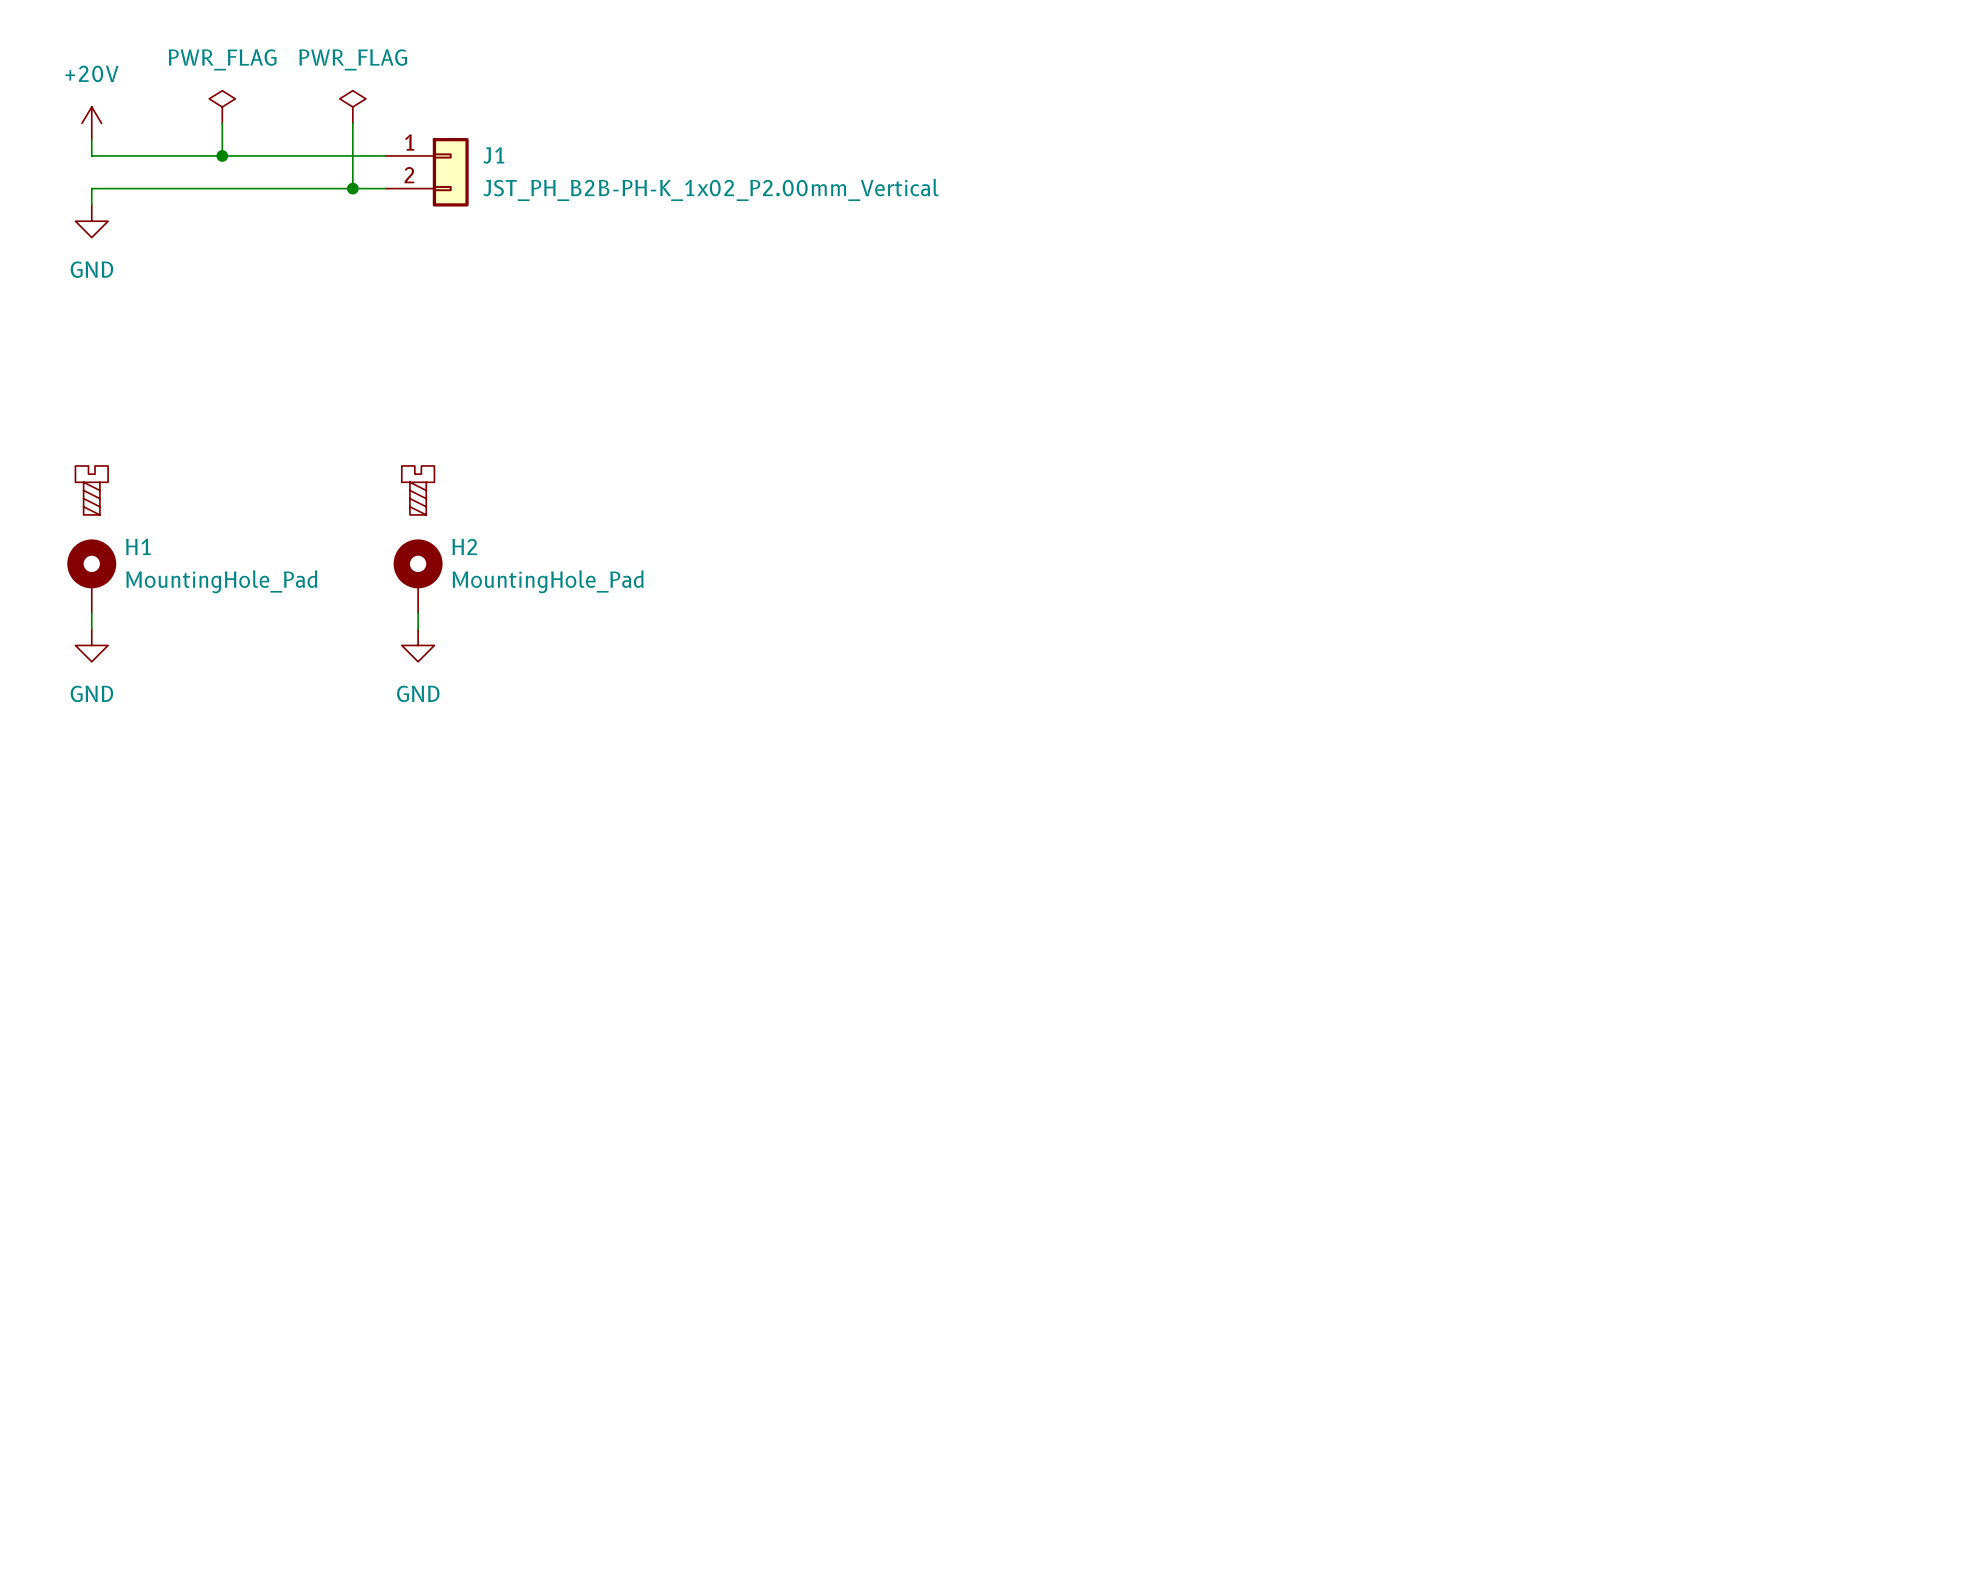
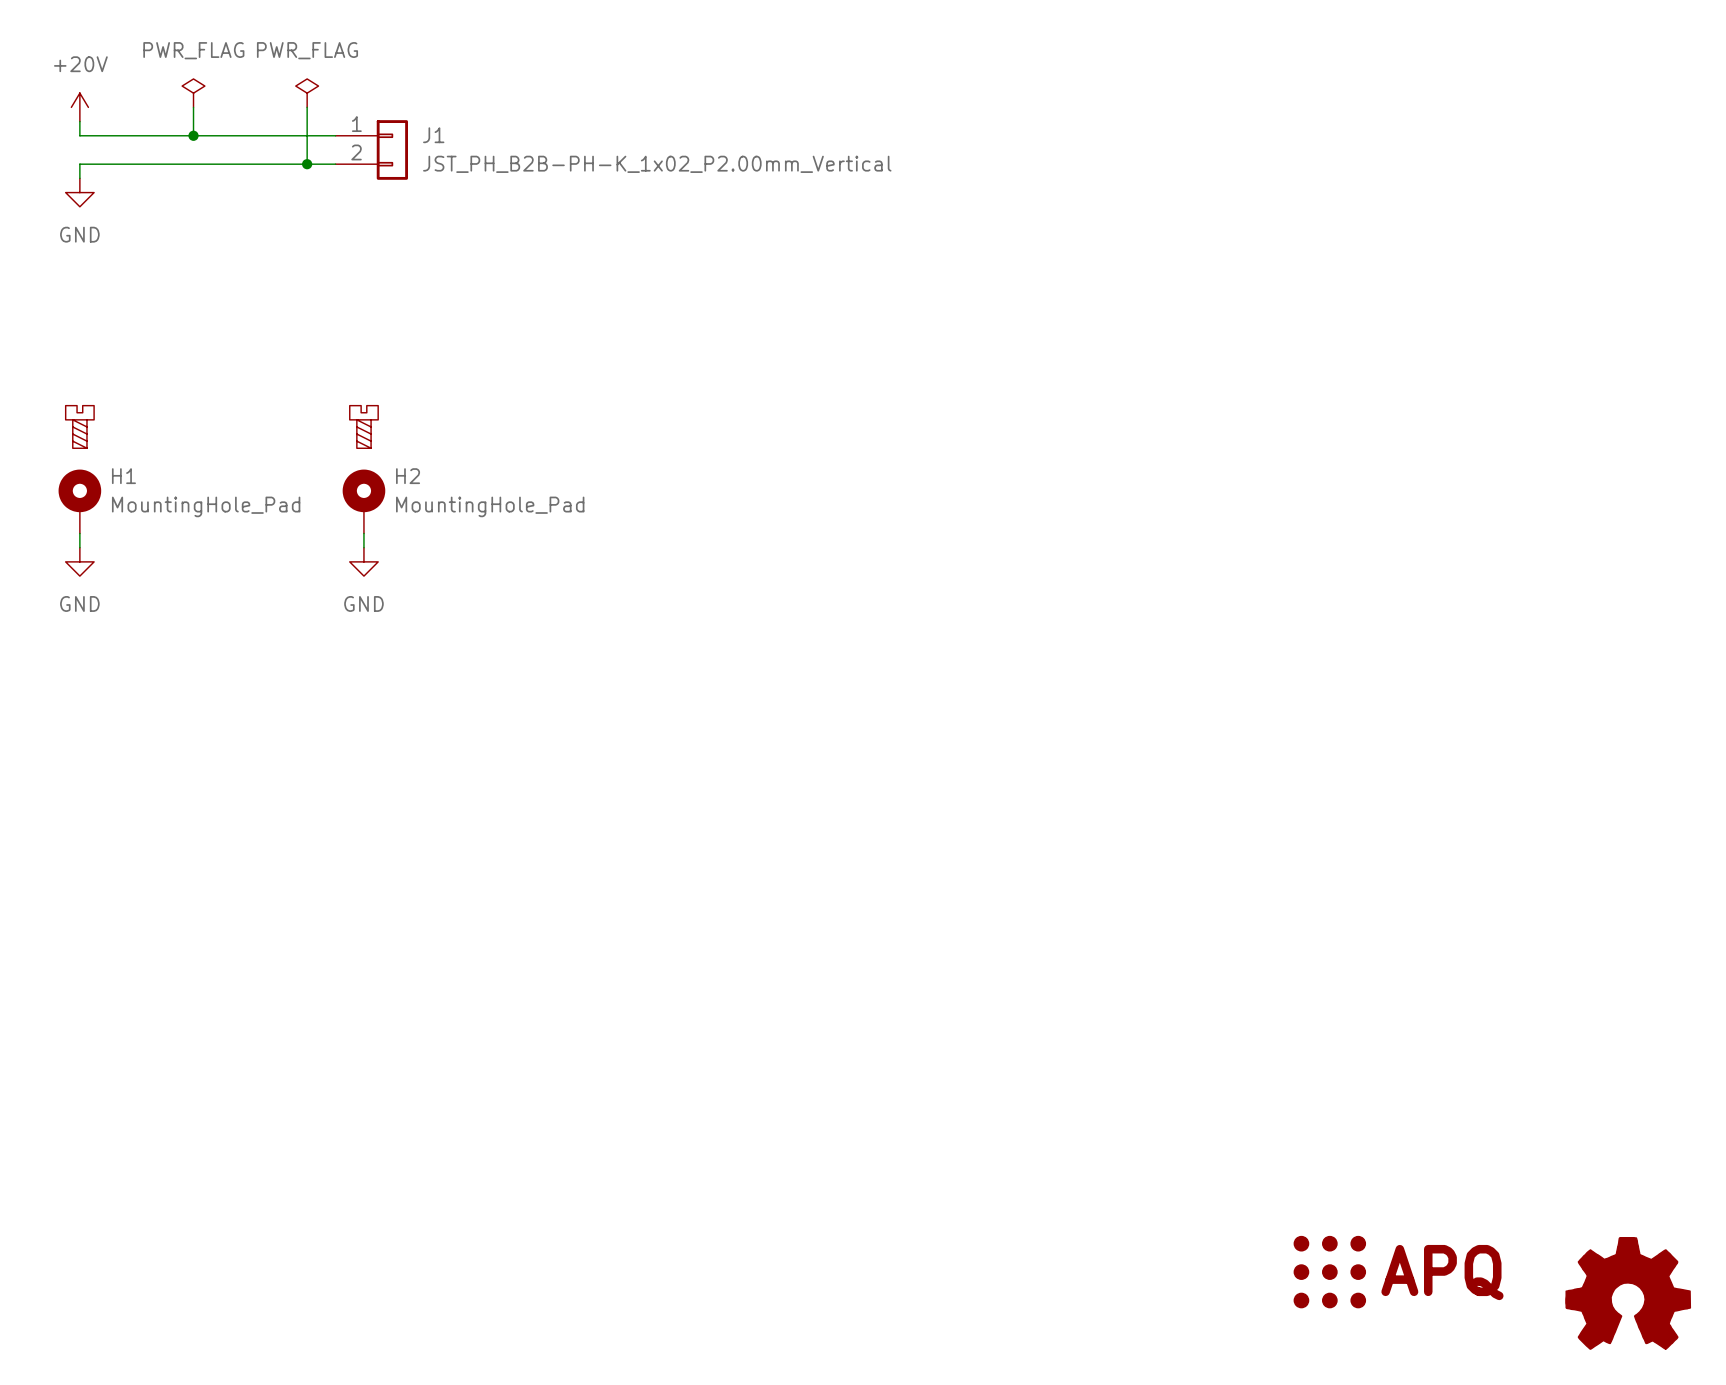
part: none -> (1329, 1272)
part: none -> (1628, 1293)

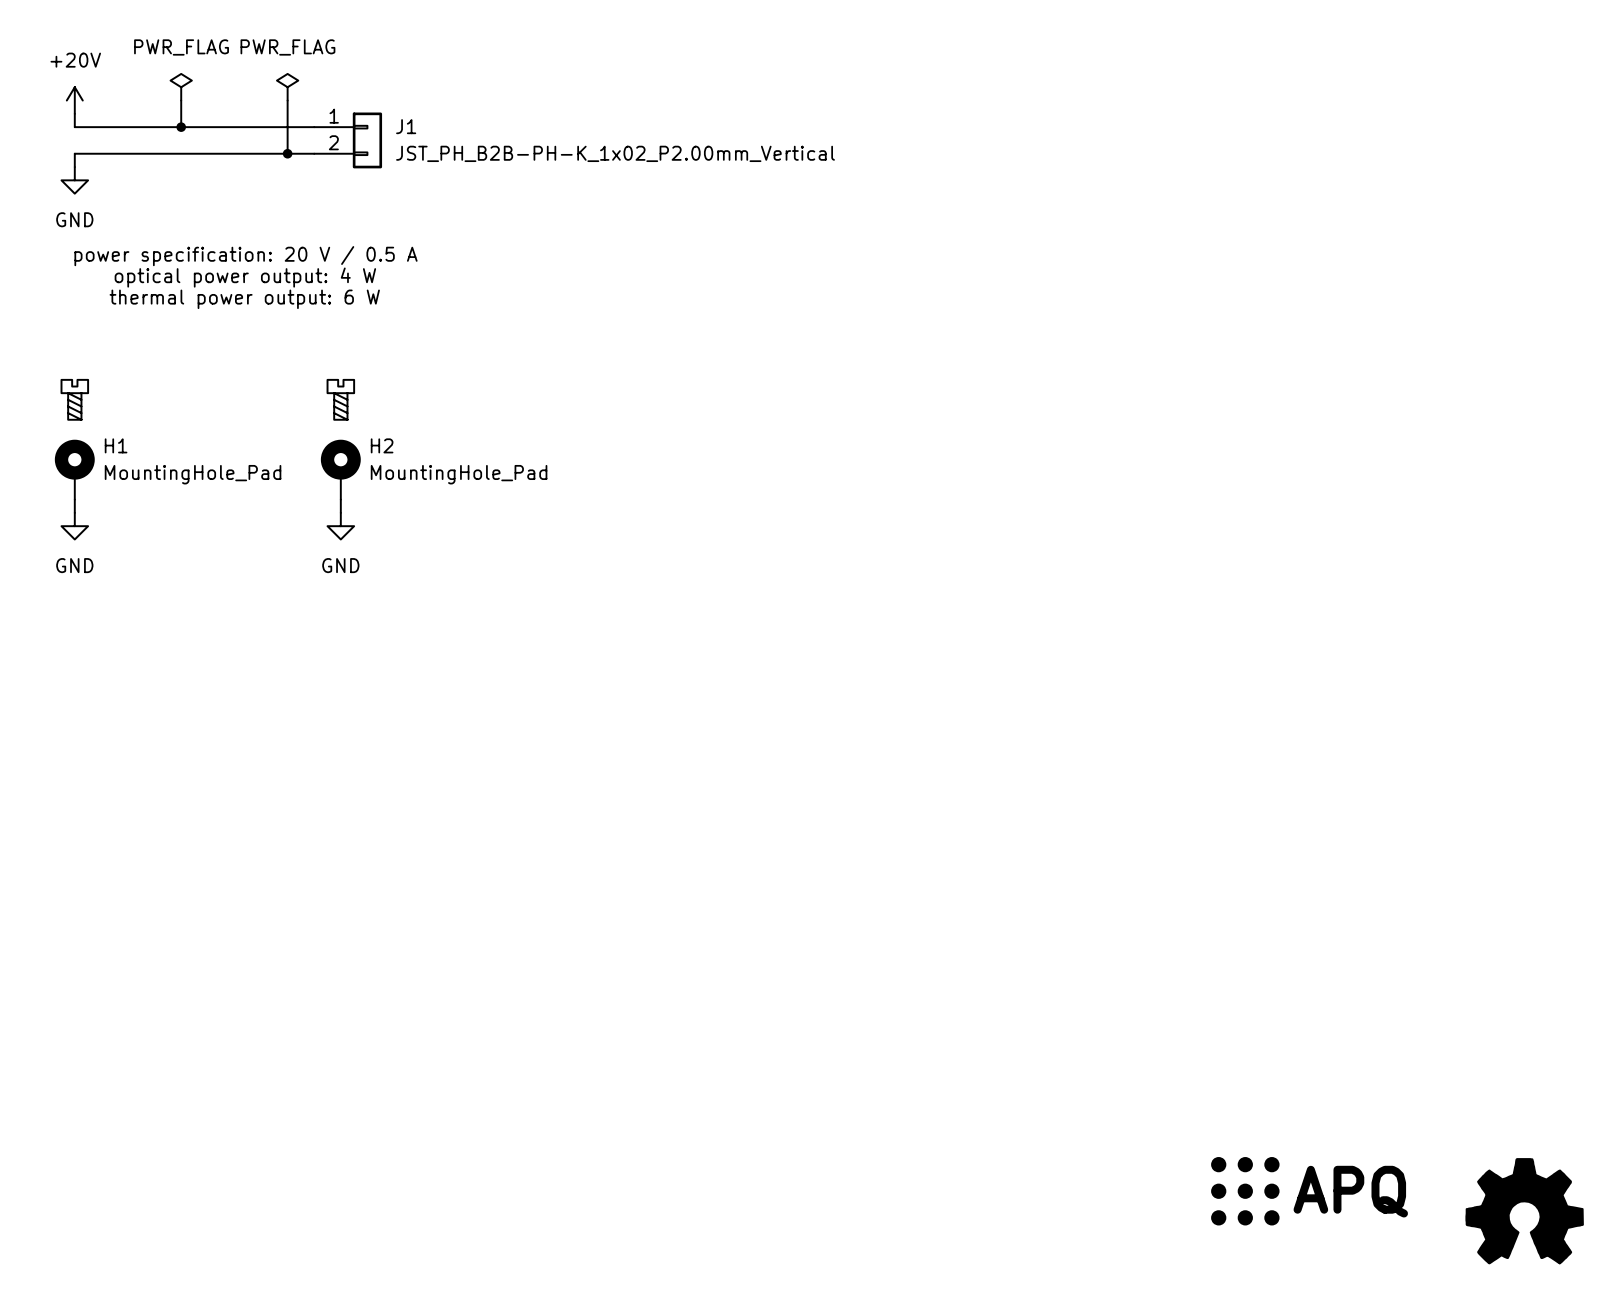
text: none -> power specification: 20 V / 0.5 A (246, 256)
text: none -> optical power output: 4 W (245, 277)
text: none -> thermal power output: 6 W (244, 299)

